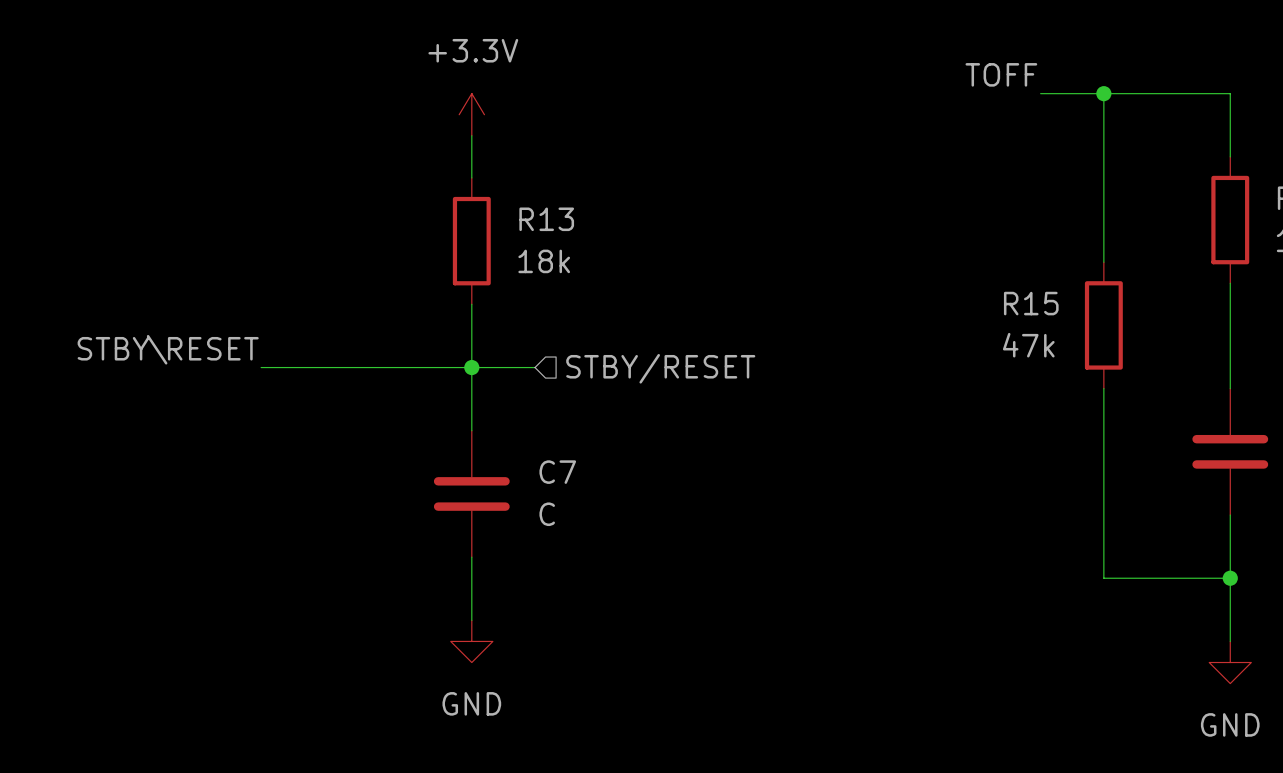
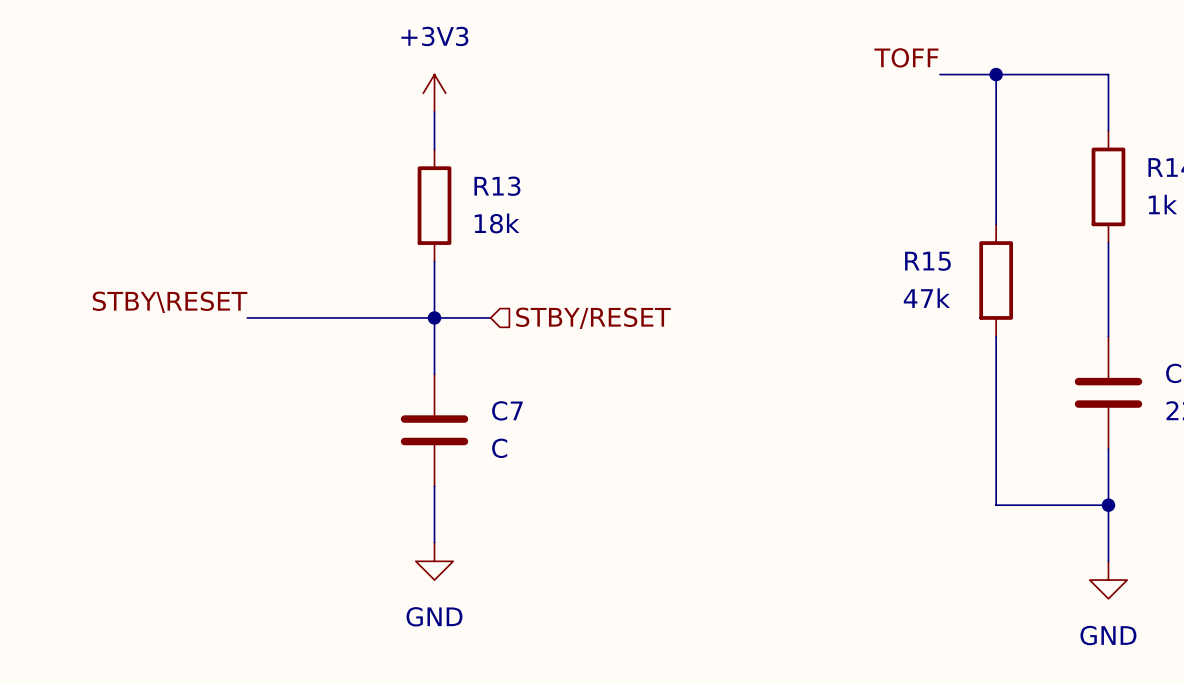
power symbol: +3.3V (471, 114) -> +3V3 (434, 93)

